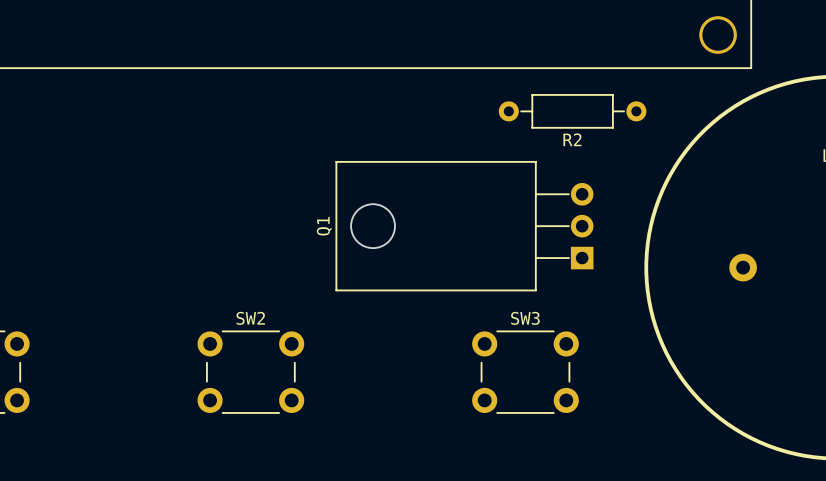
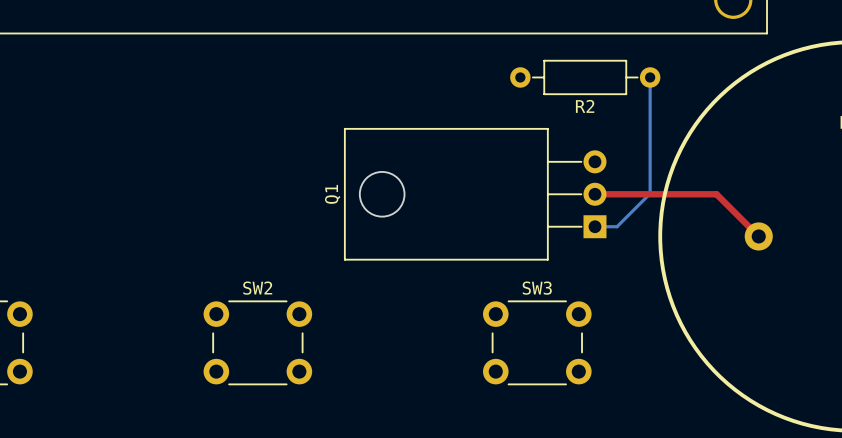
bottom track: none -> (650, 77) (650, 193) (617, 226) (594, 226)
top track: none -> (594, 194) (716, 194) (758, 236)

